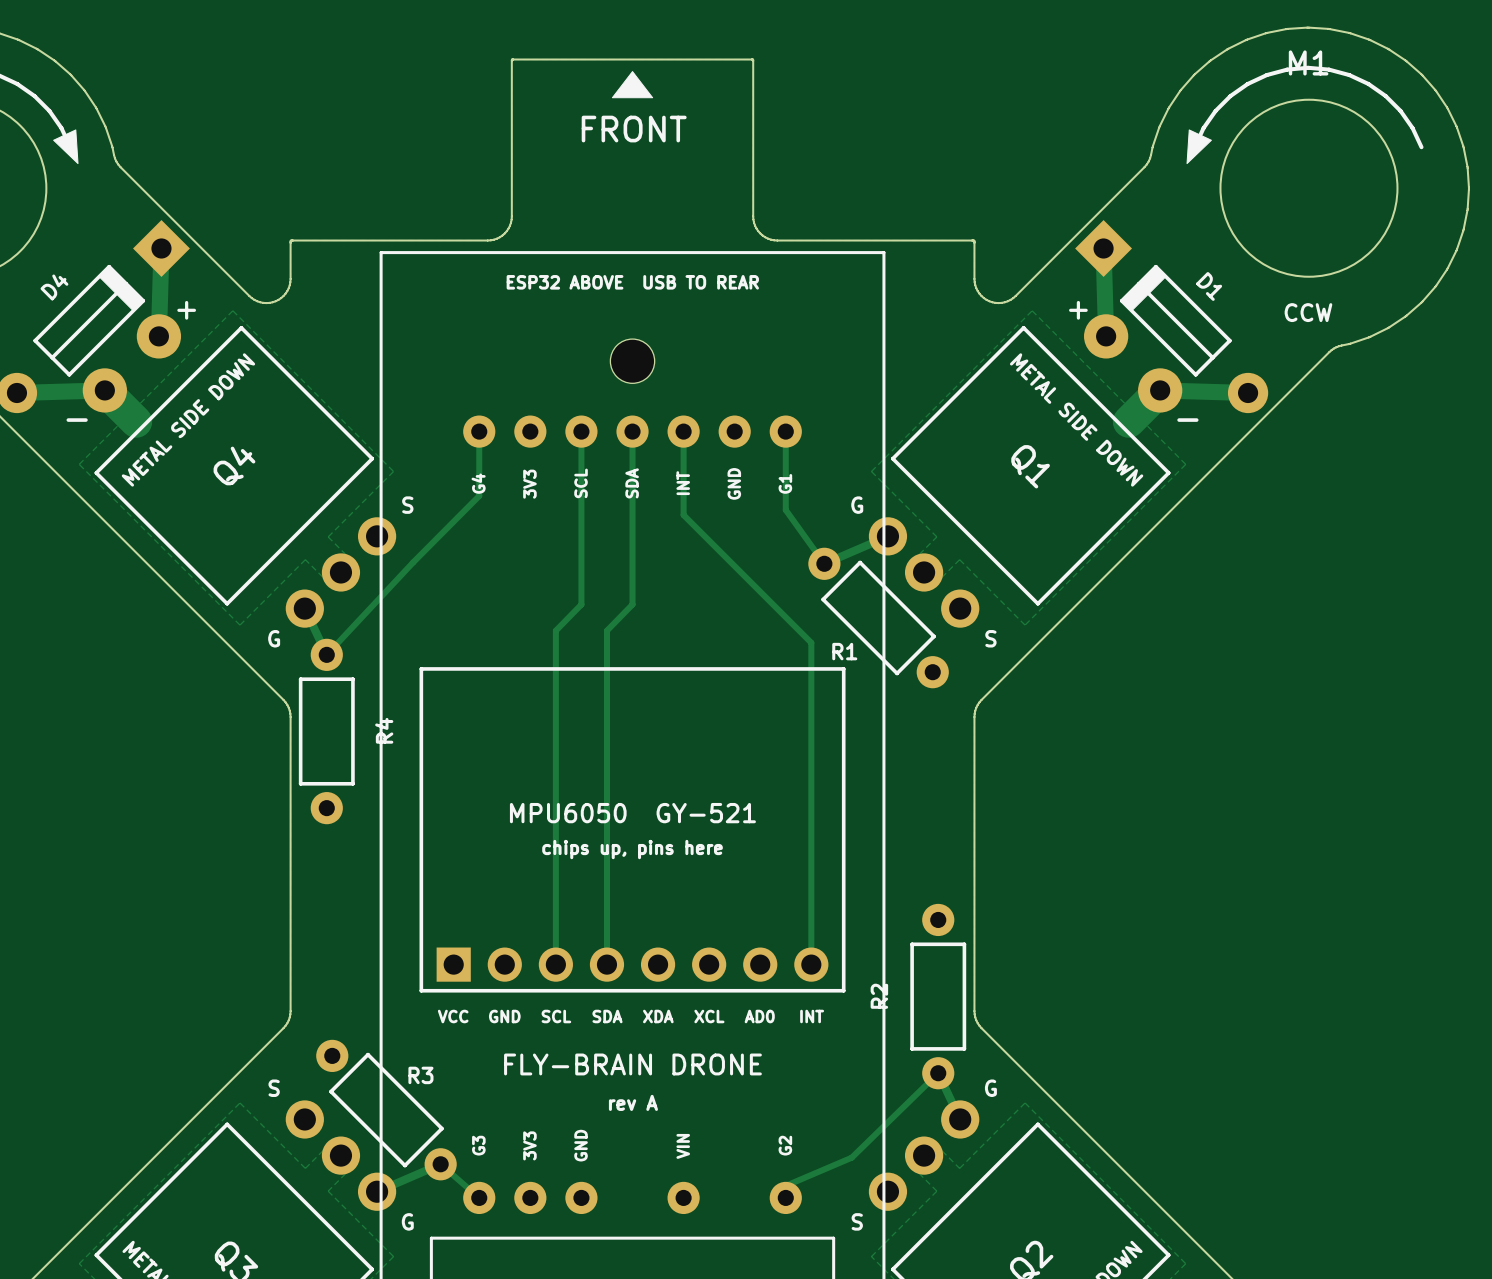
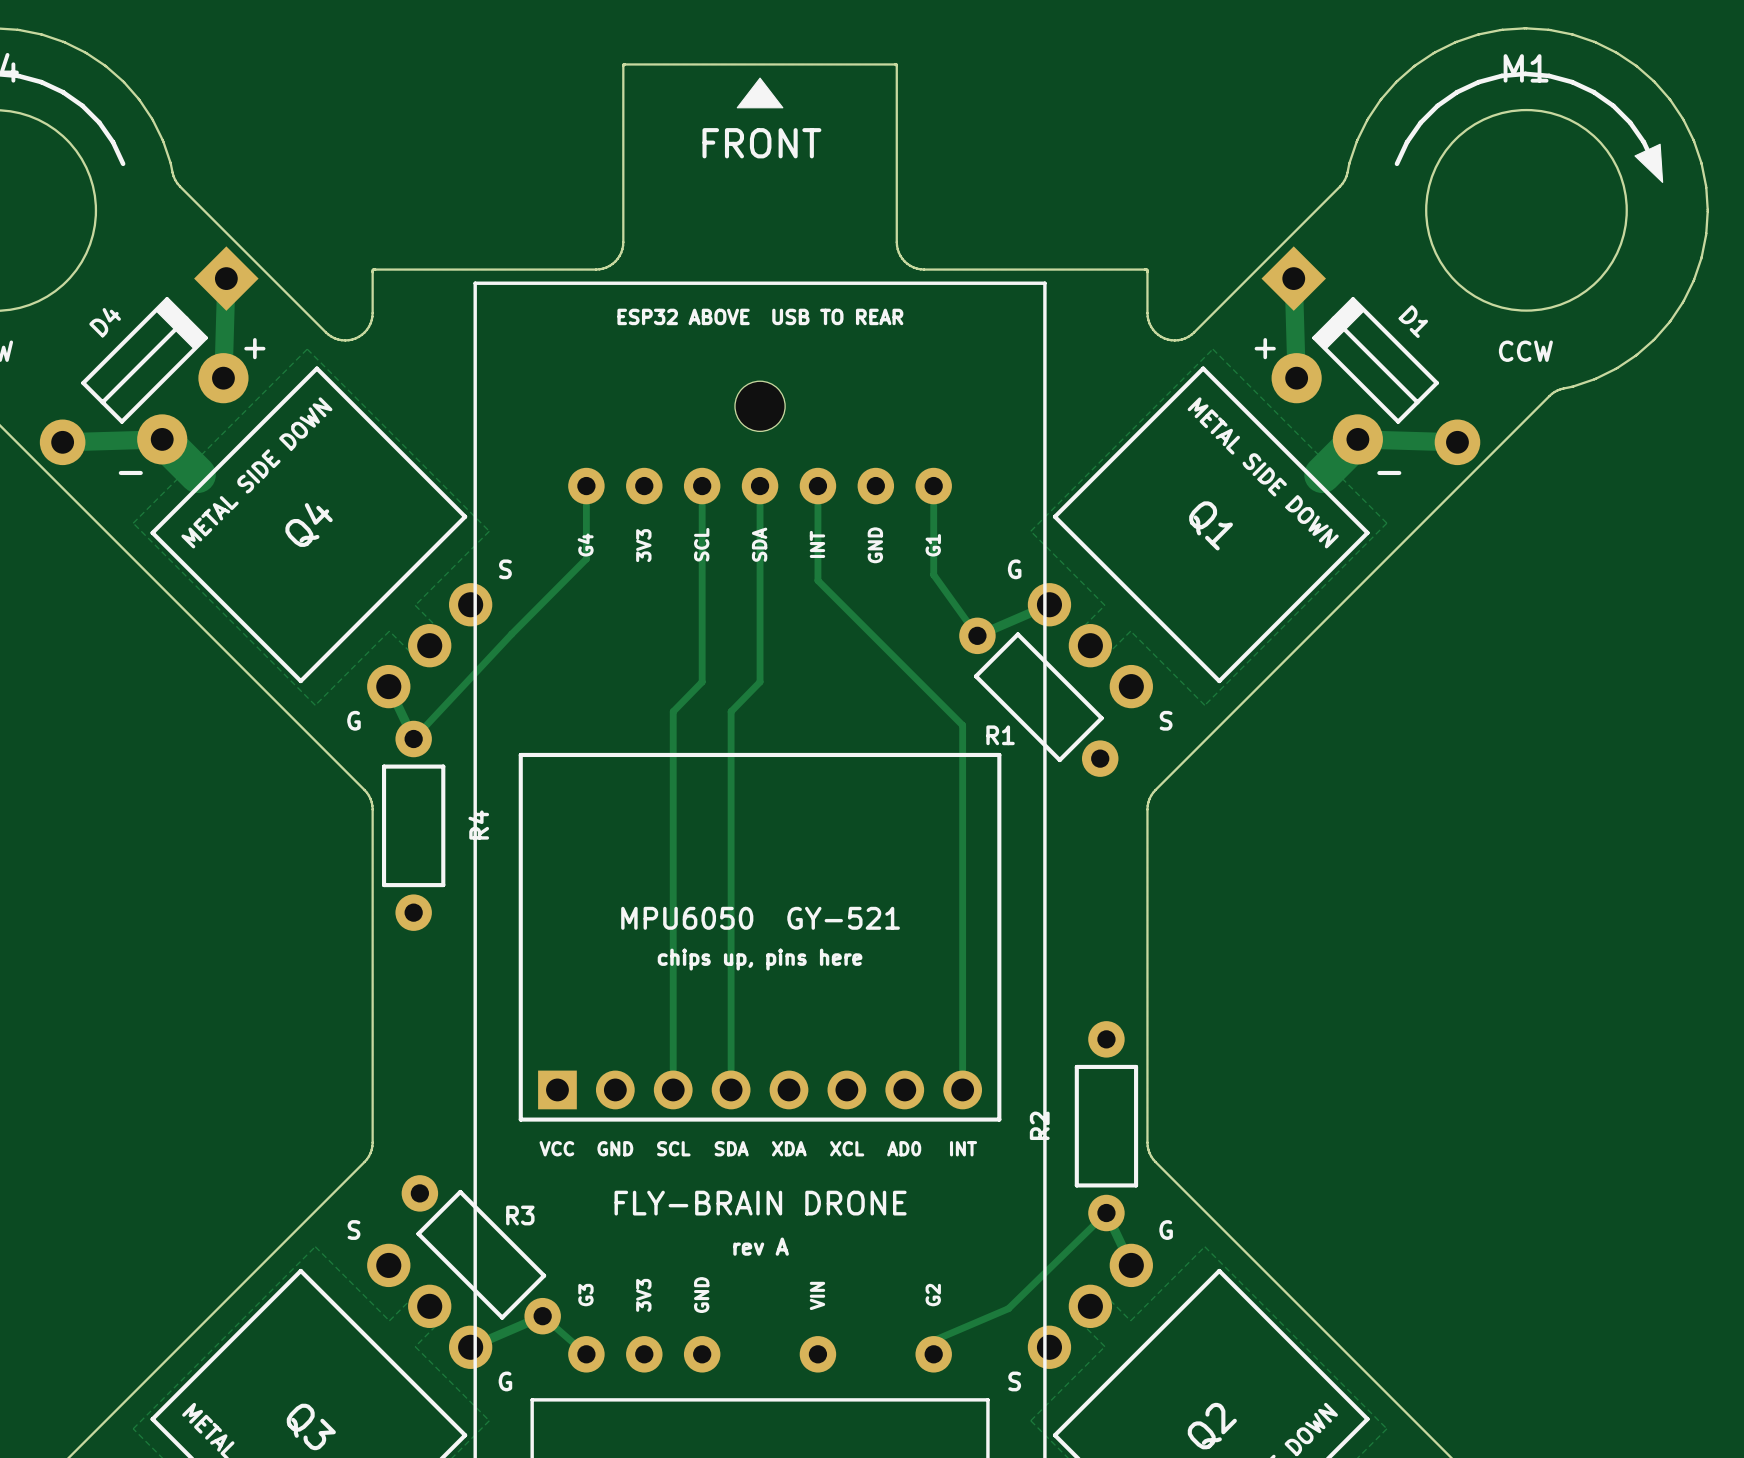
drawing: [53, 129, 79, 165] -> none
drawing: [1186, 129, 1212, 165] -> none
drawing: none -> [1634, 143, 1664, 183]

